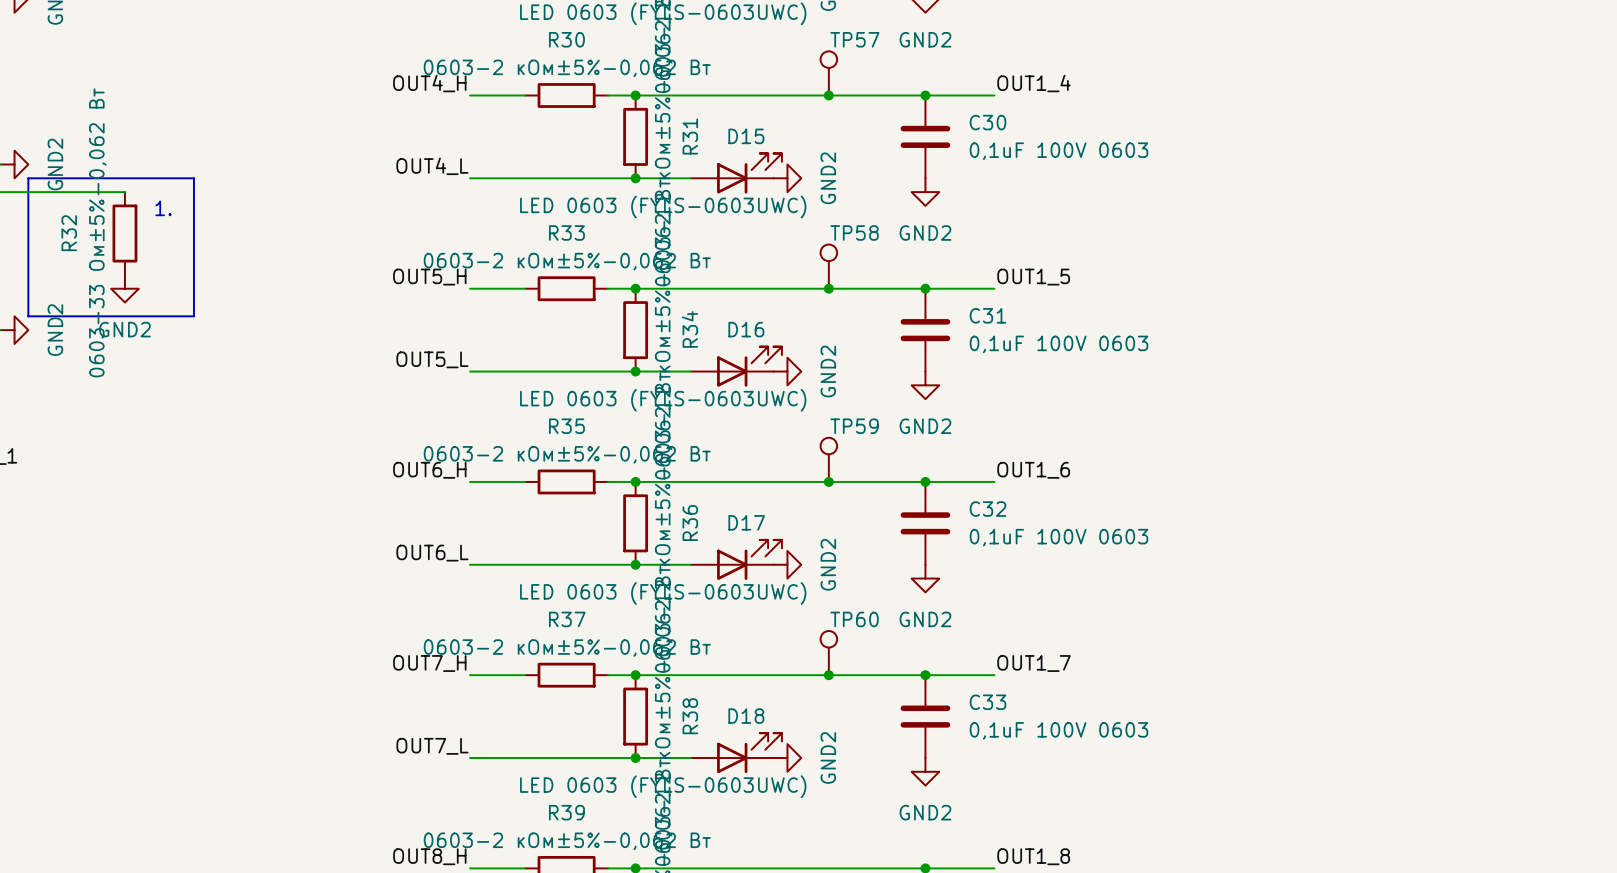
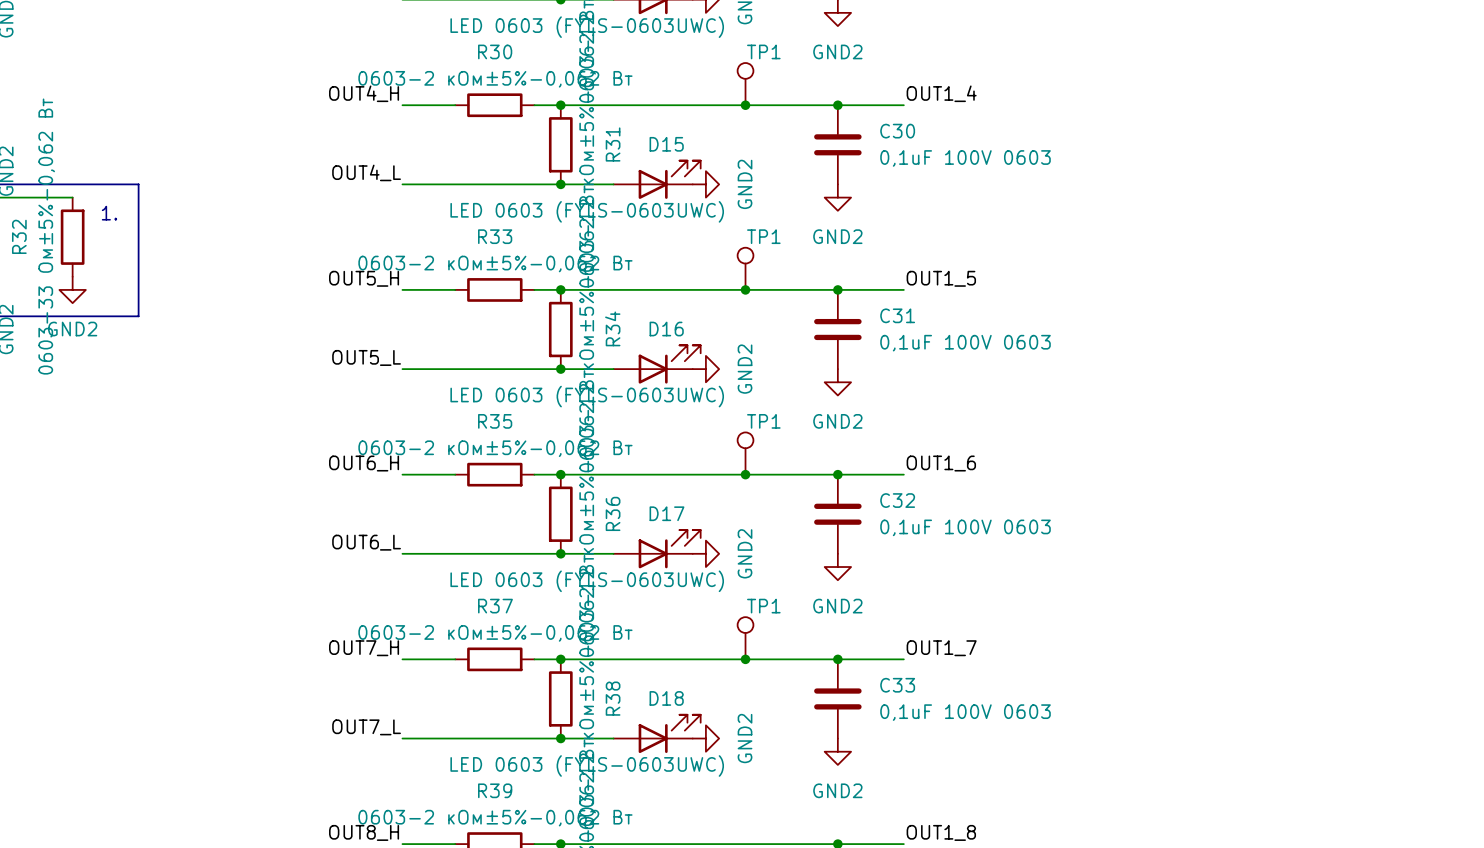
TP57 name: TP57 (854, 39) -> TP1 (763, 51)
TP58 name: TP58 (854, 232) -> TP1 (763, 236)
TP59 name: TP59 (854, 426) -> TP1 (763, 421)
TP60 name: TP60 (854, 619) -> TP1 (763, 606)

